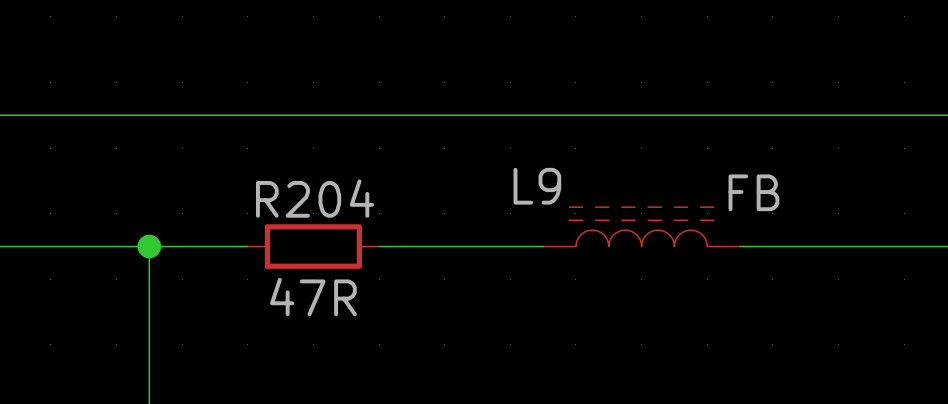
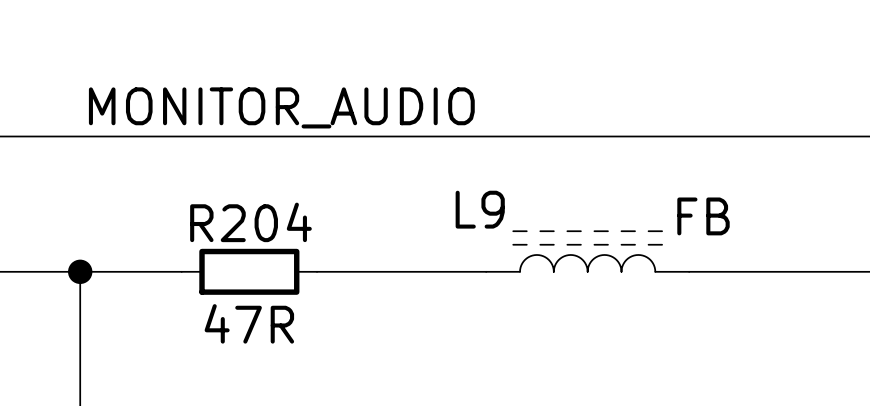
label: none -> MONITOR_AUDIO (281, 107)

